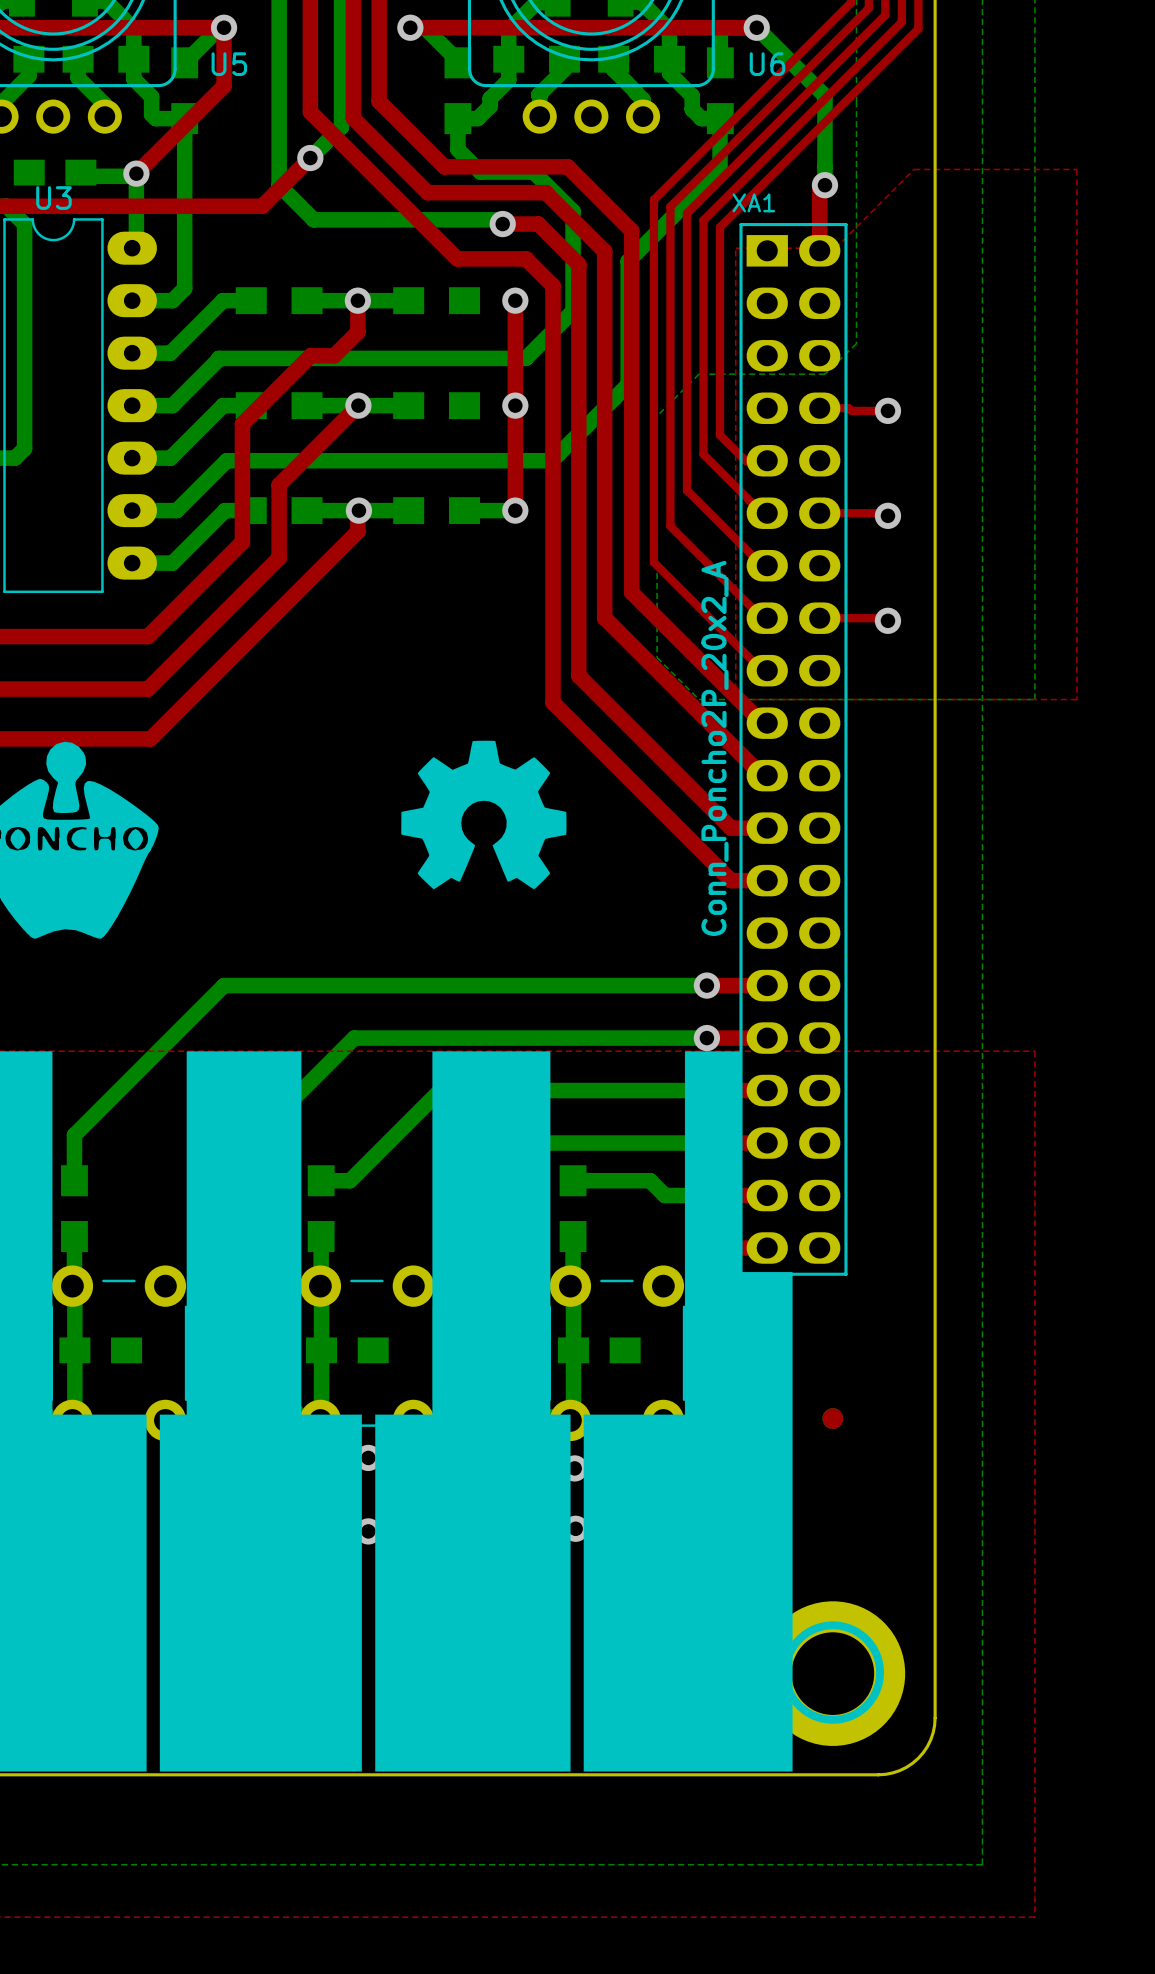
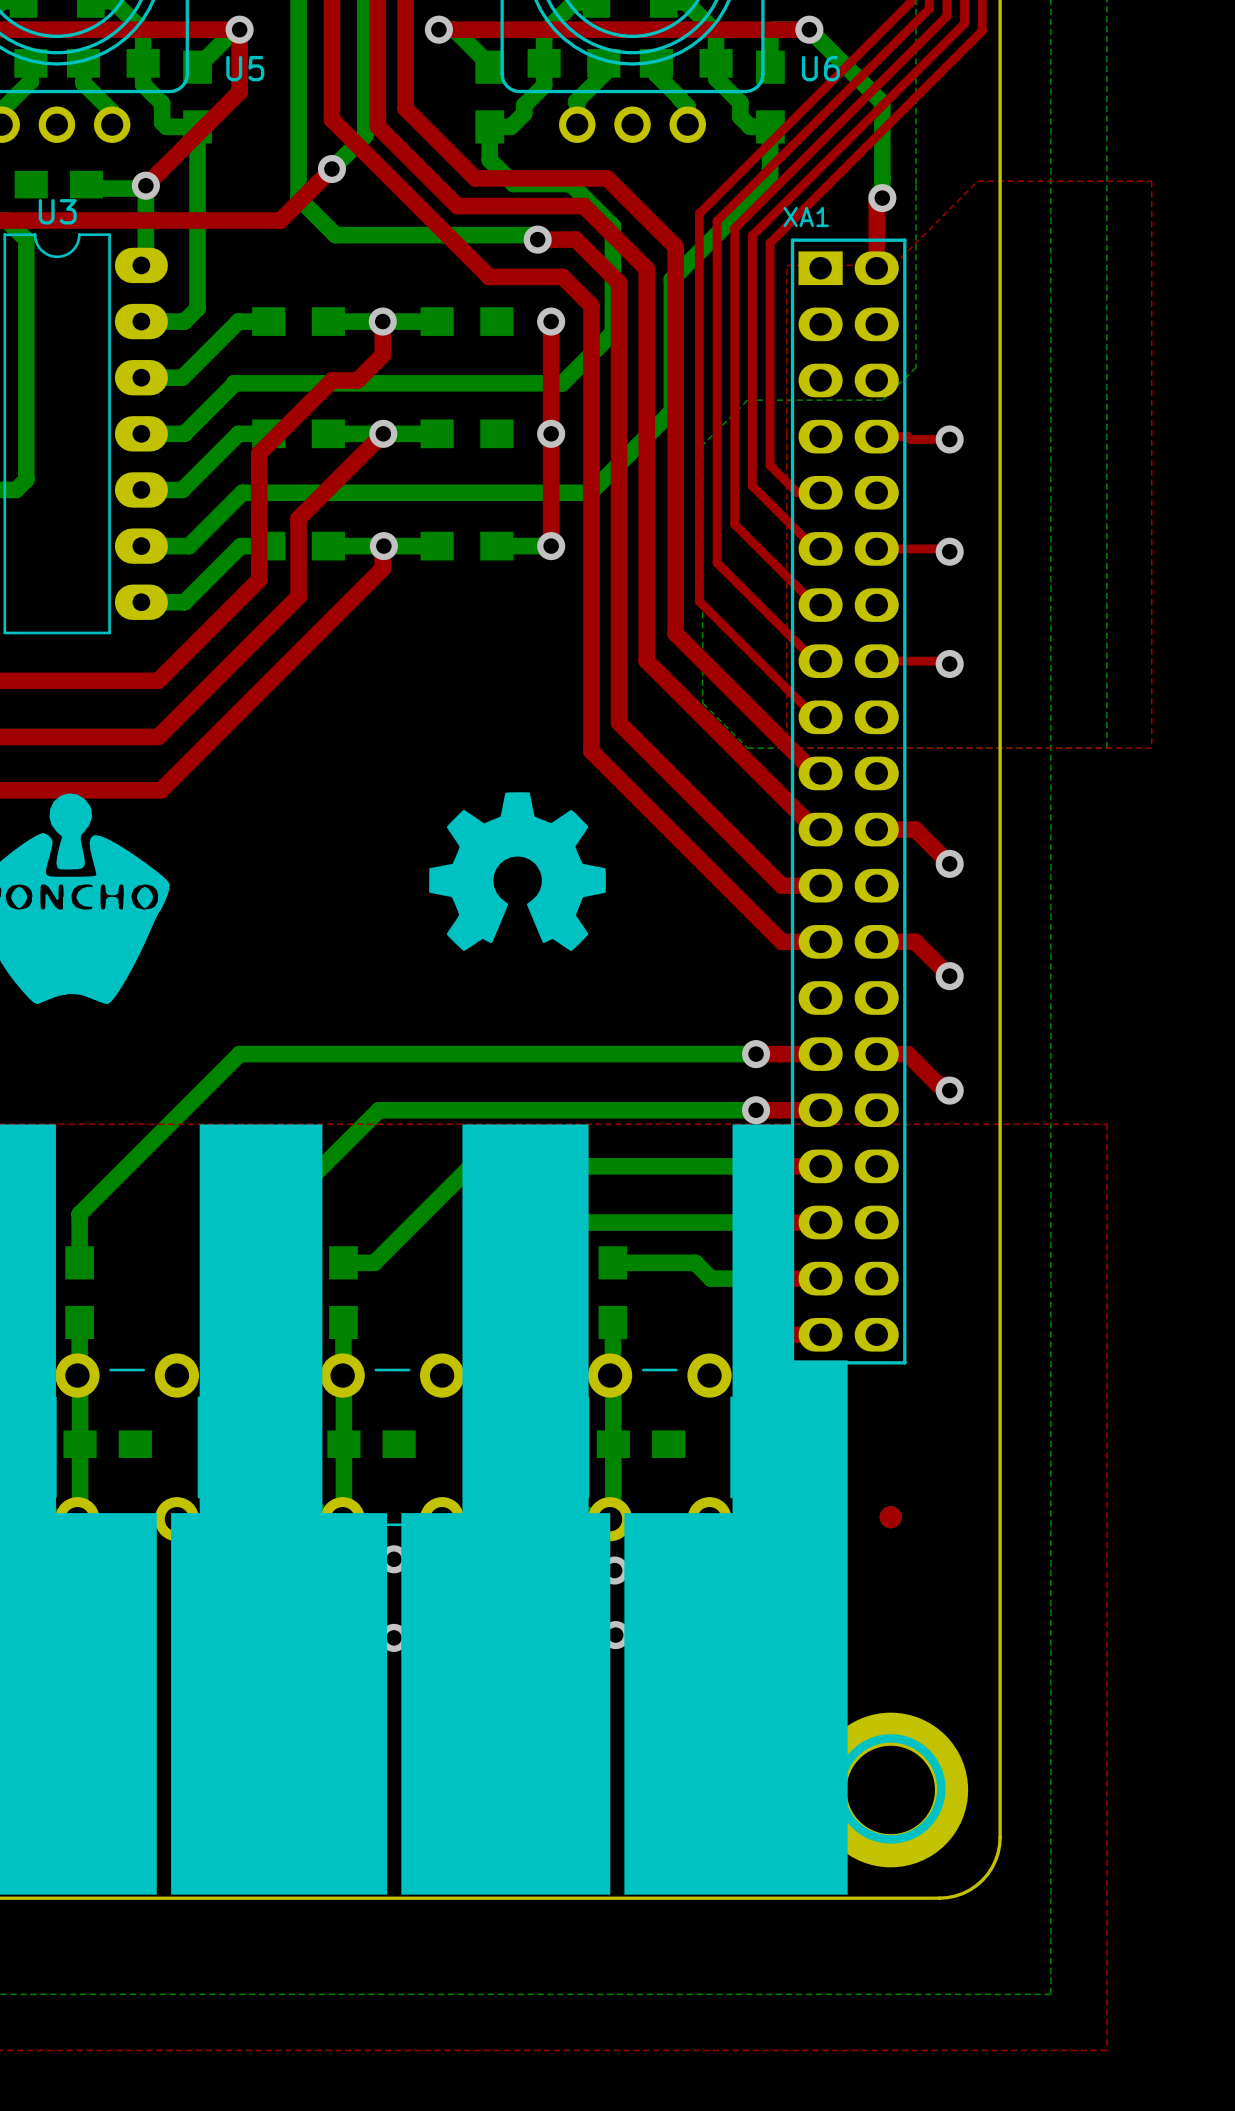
XA1 value: Conn_Poncho2P_20x2_A (714, 748) -> none
top track: none -> (876, 829) (915, 829) (949, 863)
via: none -> (949, 863)
top track: none -> (876, 941) (915, 941) (949, 976)
via: none -> (949, 976)
top track: none -> (876, 1054) (907, 1054) (938, 1084) (946, 1084)
via: none -> (949, 1090)

